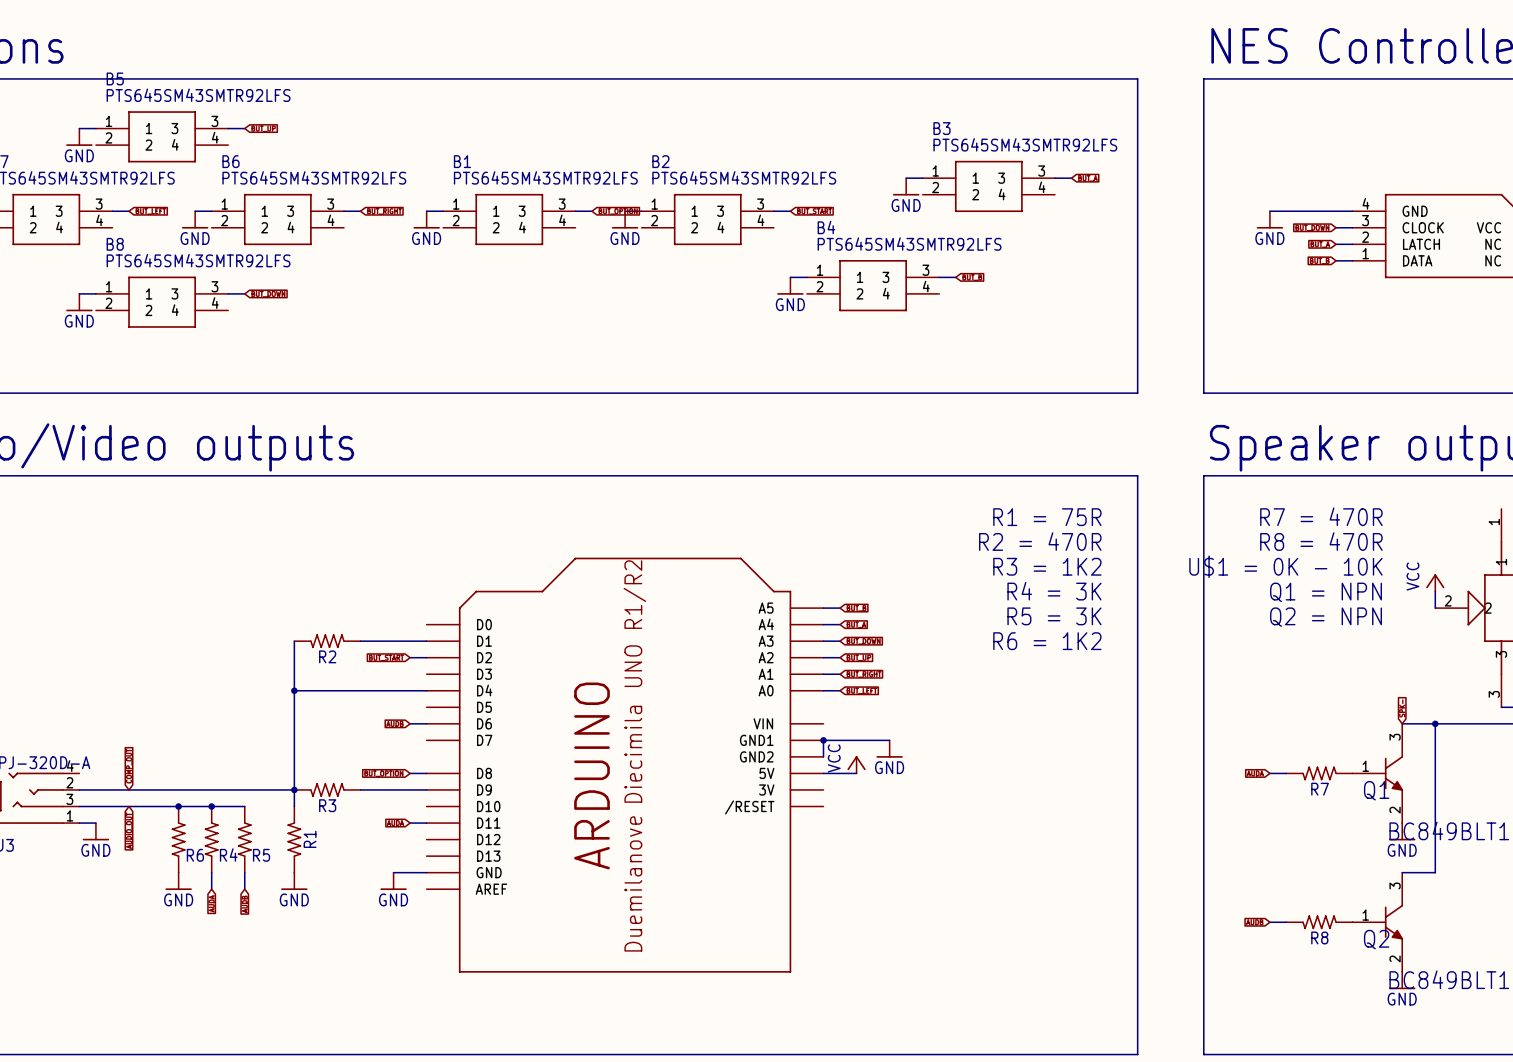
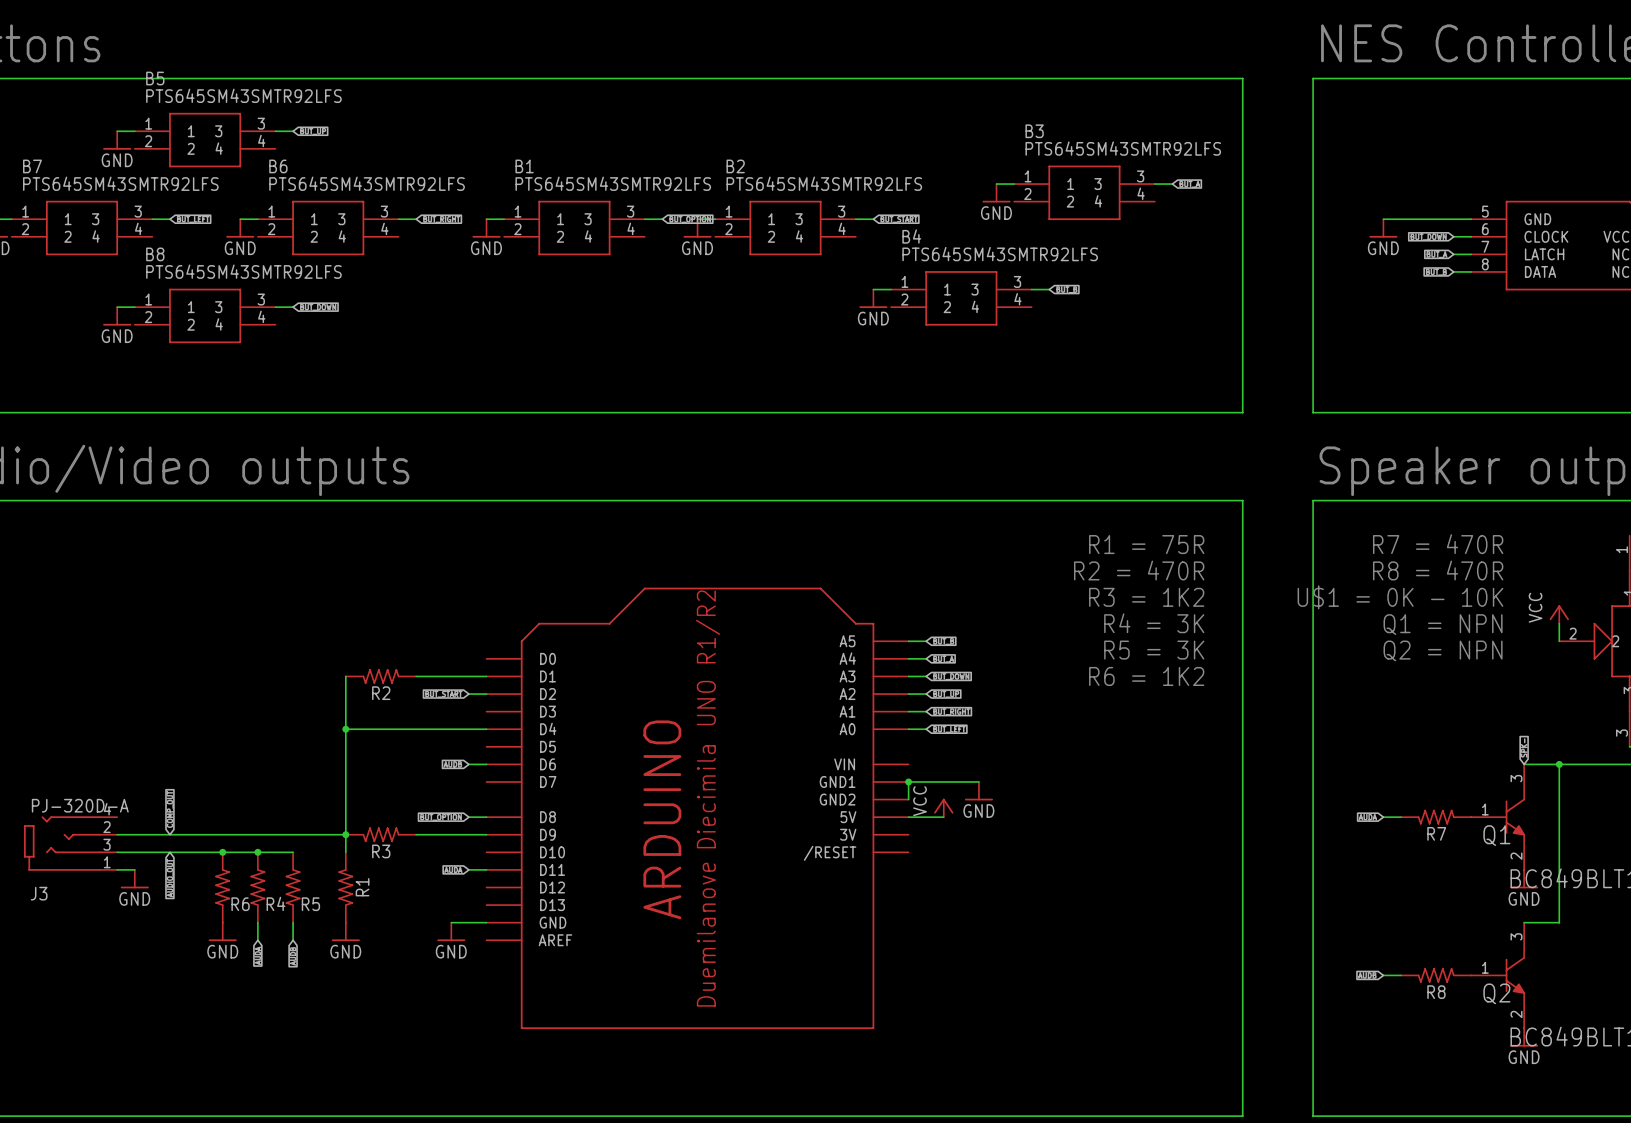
part pin number: 4 (1365, 203) -> 5 (1485, 211)
part pin number: 3 (1365, 220) -> 6 (1485, 229)
part pin number: 2 (1365, 237) -> 7 (1485, 246)
part pin number: 1 (1365, 253) -> 8 (1485, 264)

